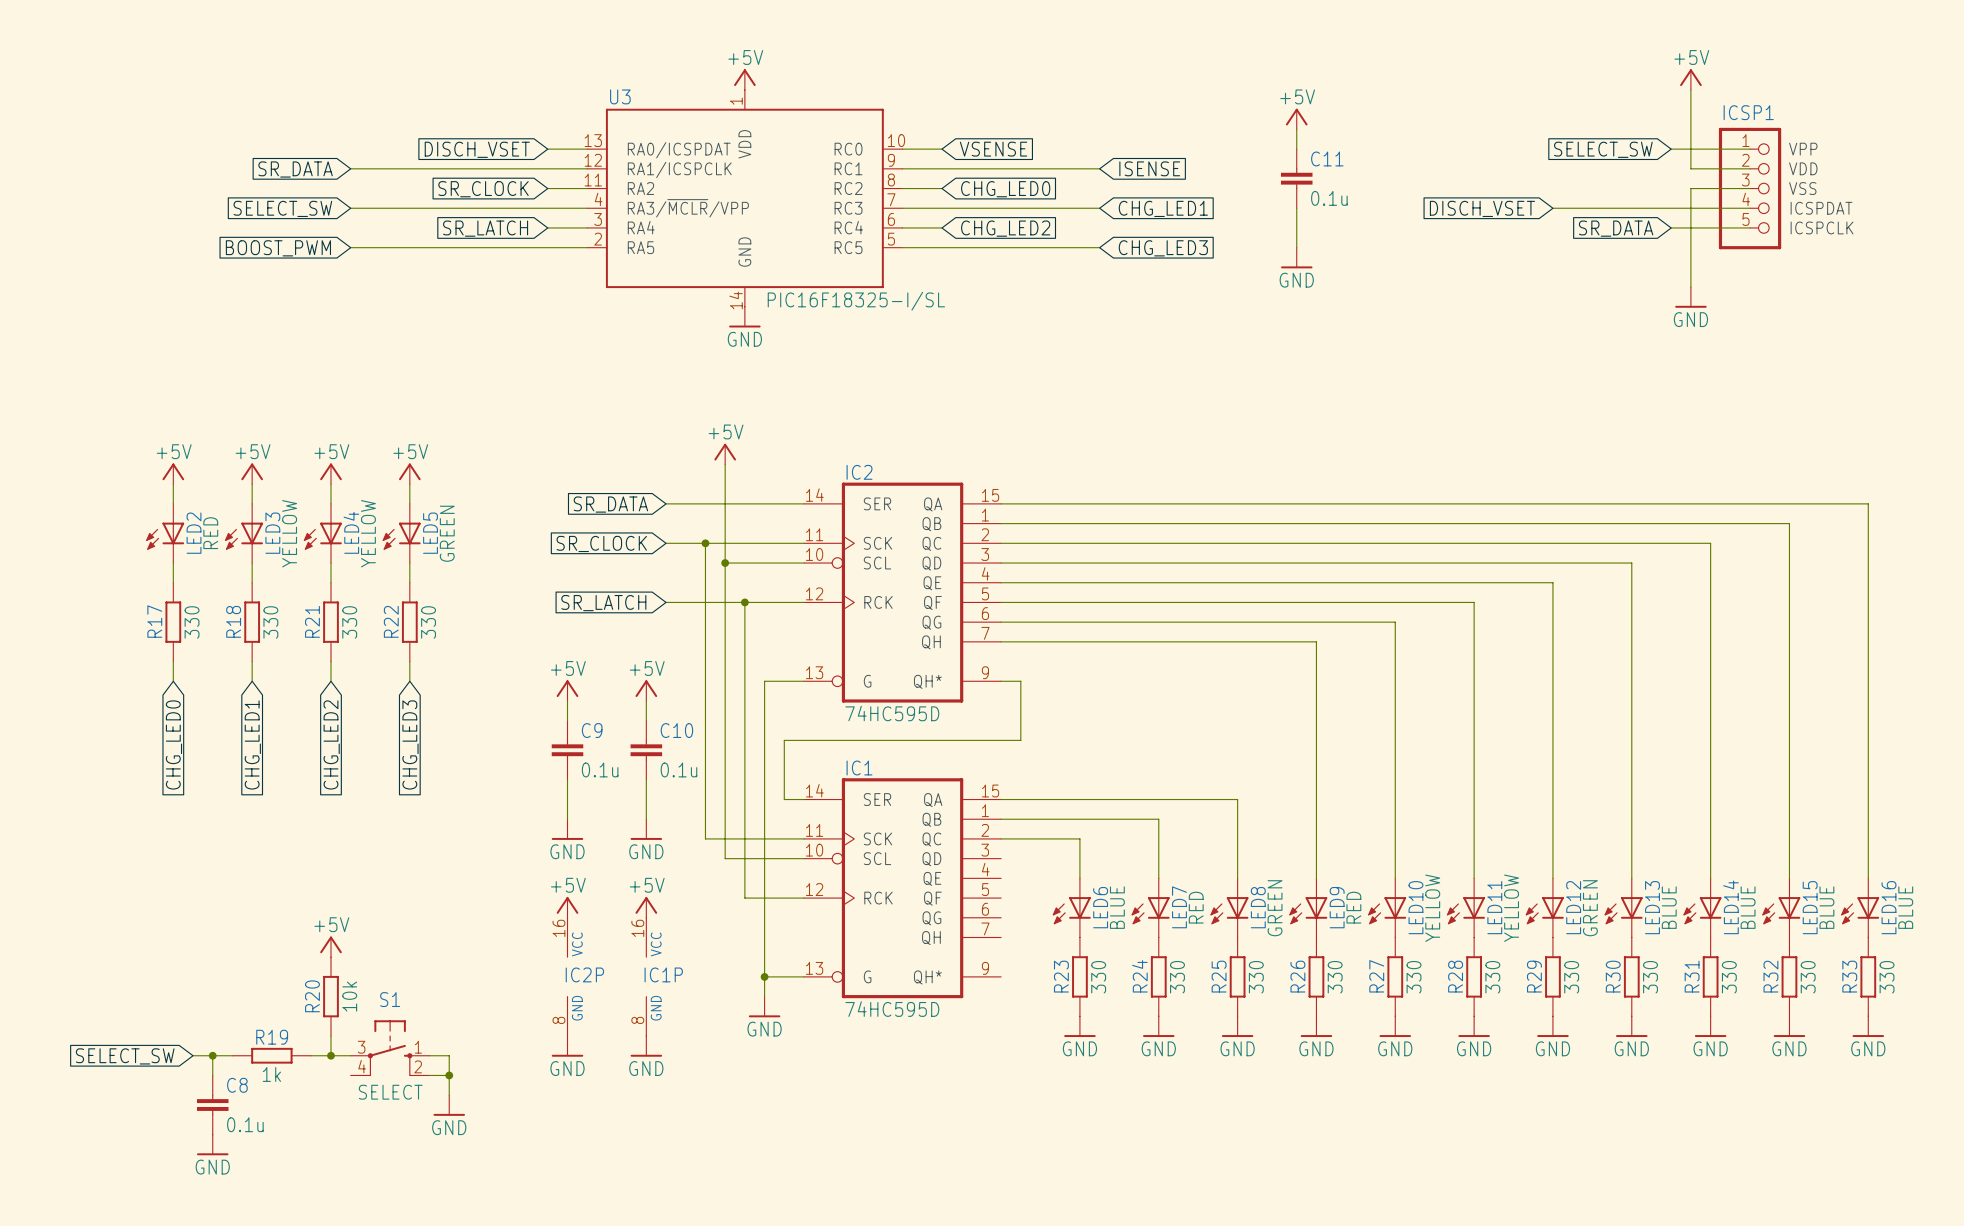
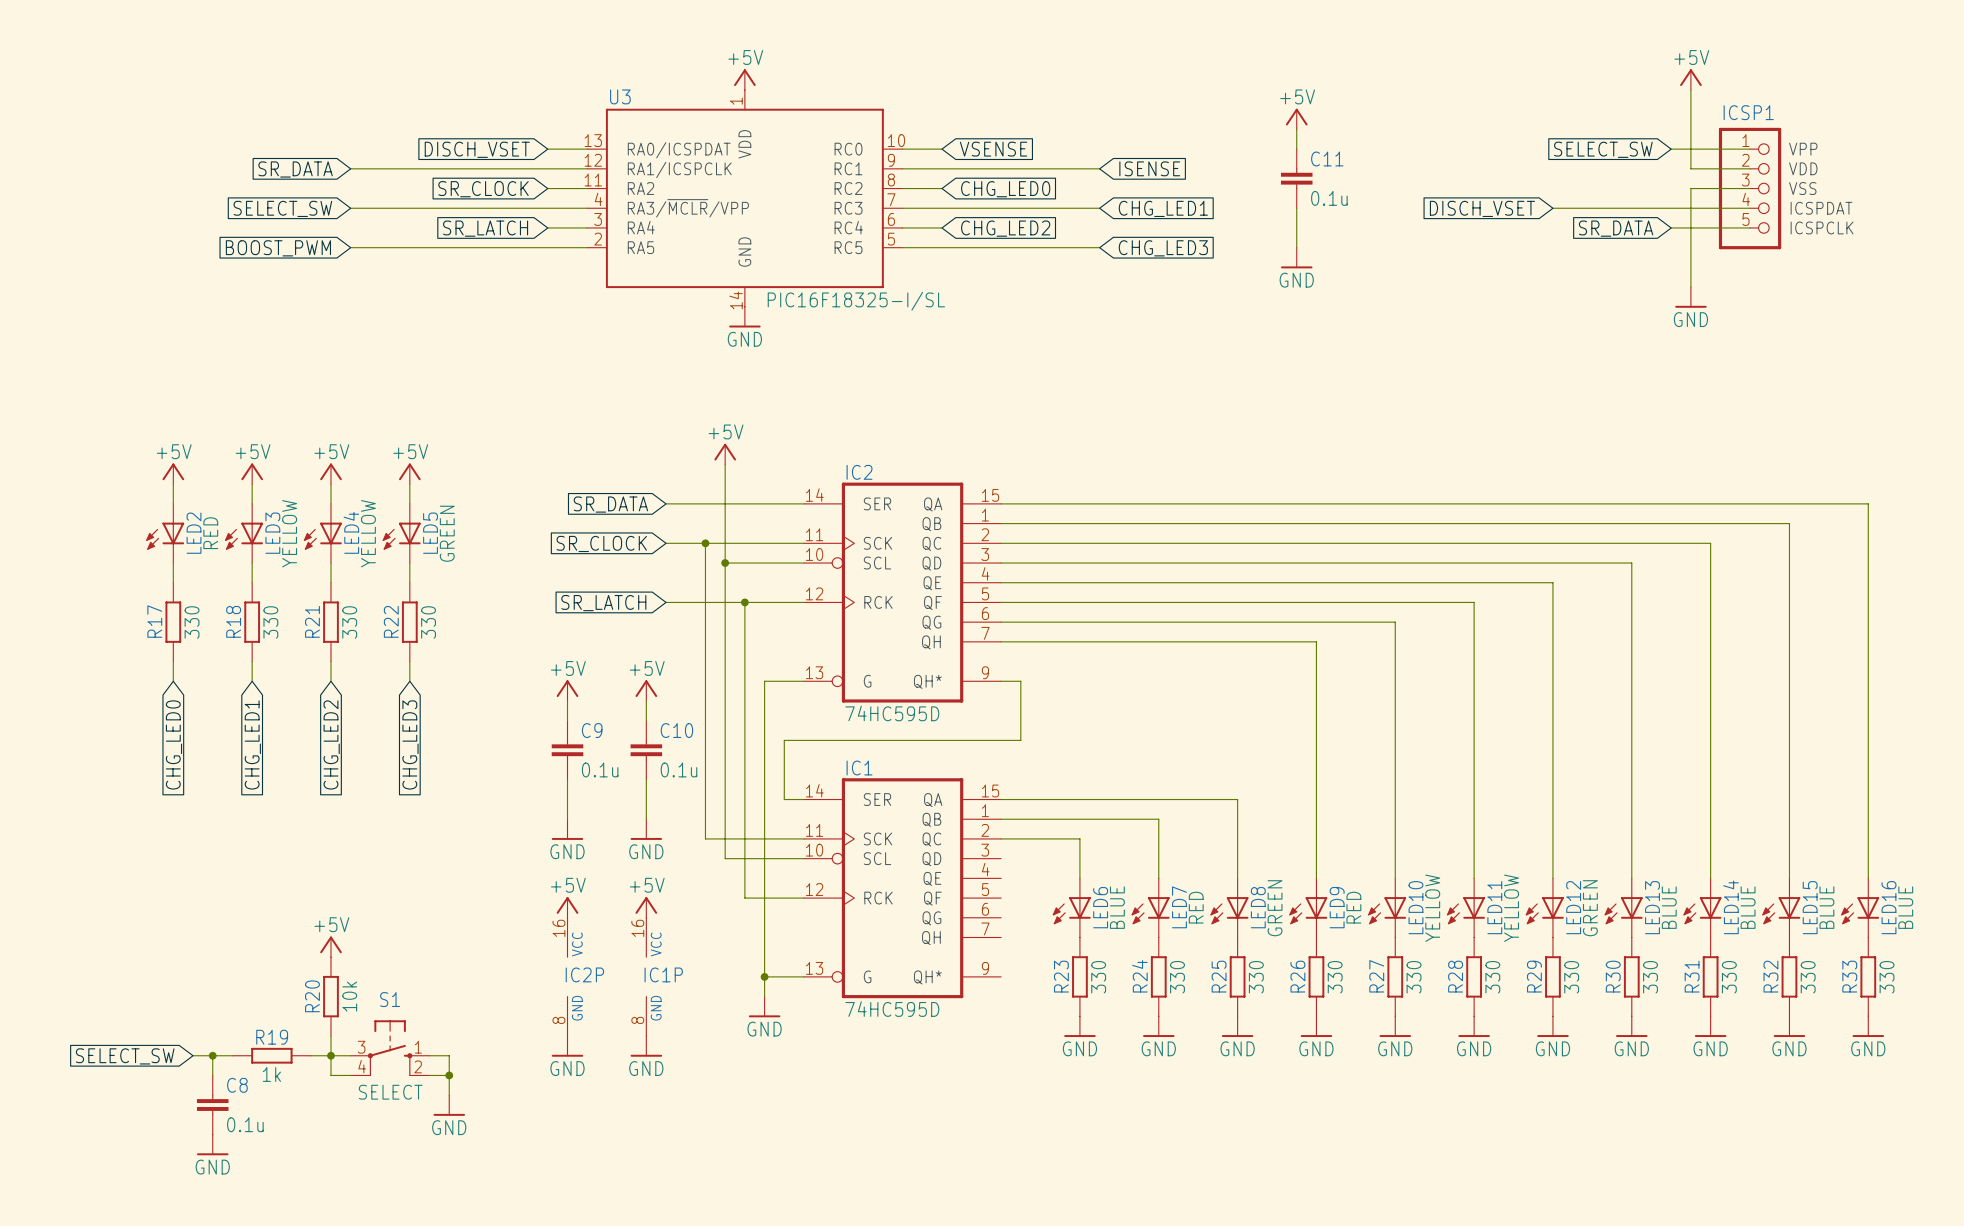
wire: none -> (330, 1055) (330, 1075) (350, 1075)

